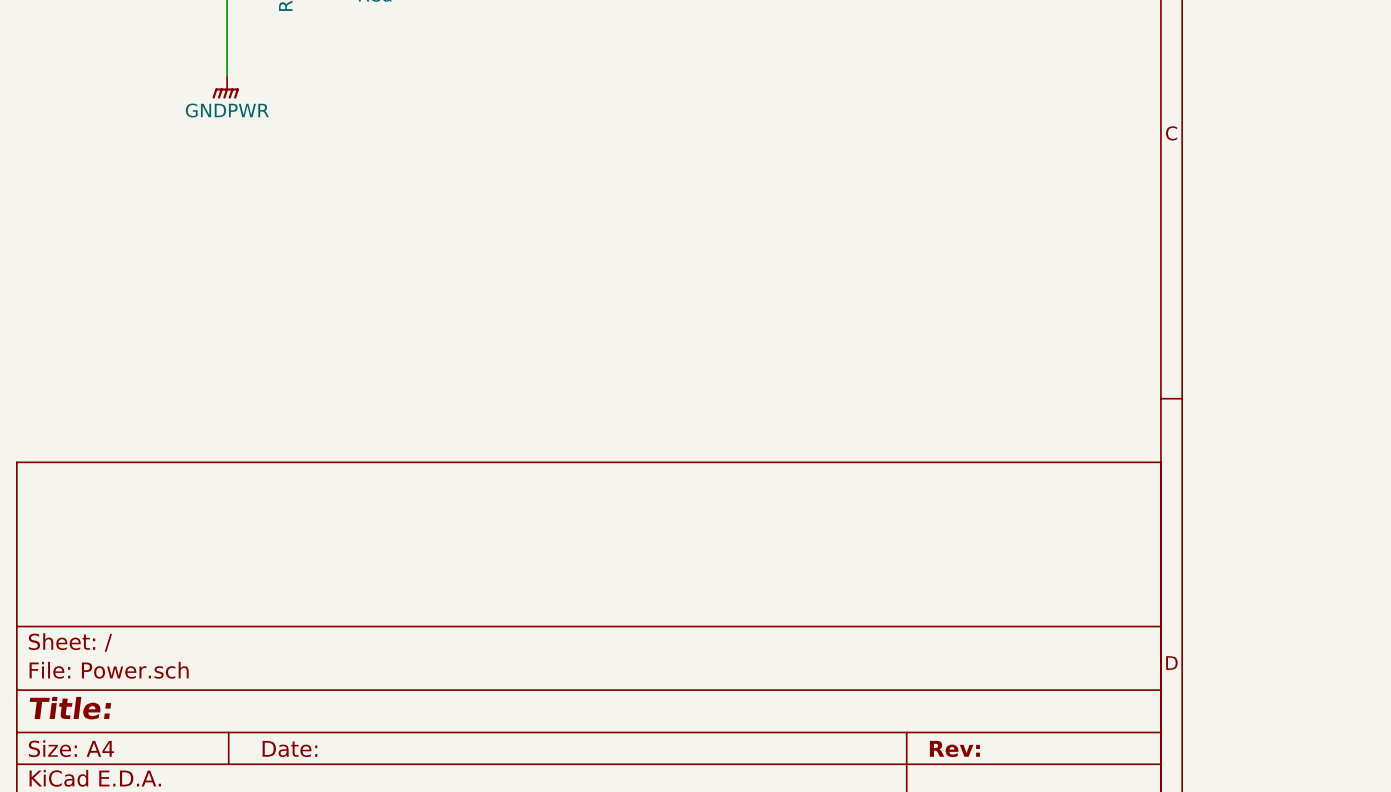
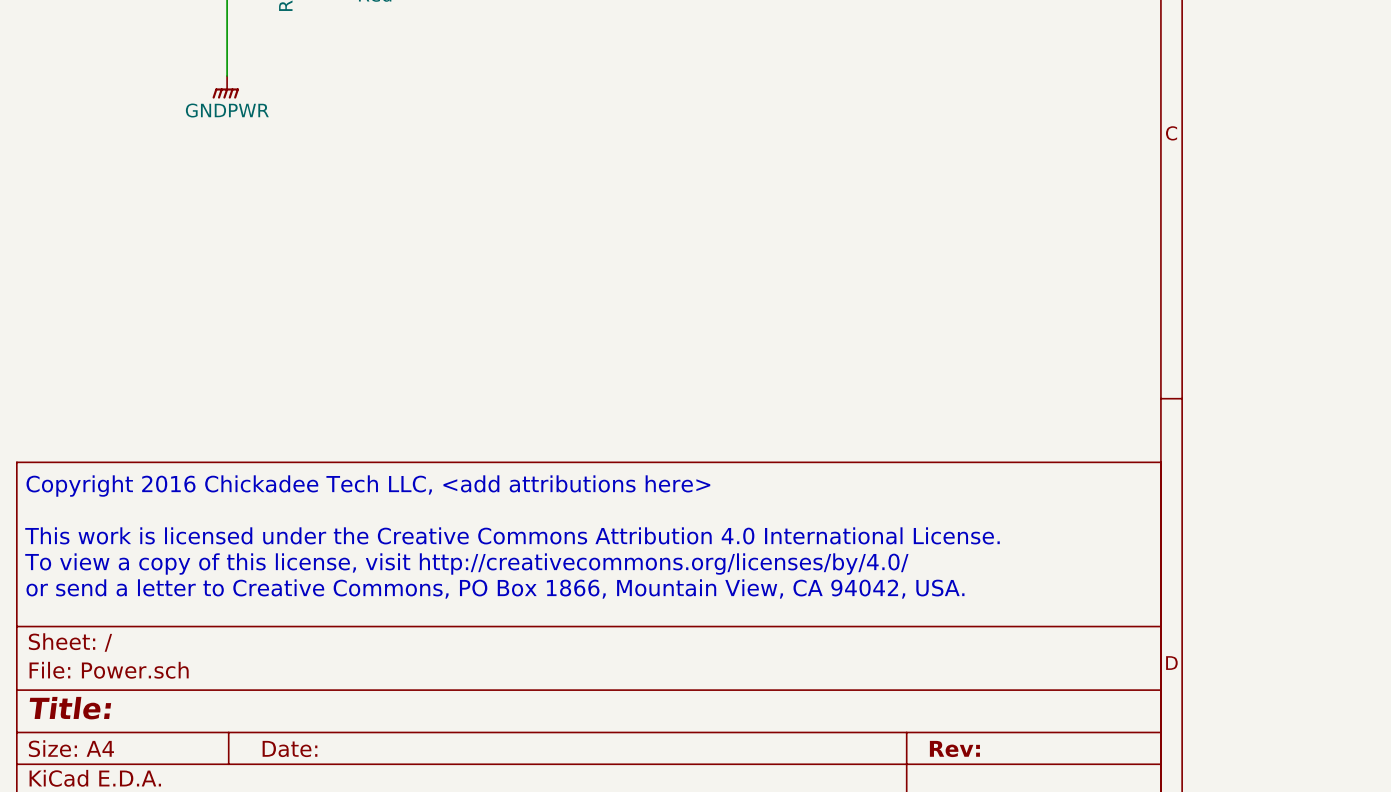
text: none -> Copyright 2016 Chickadee Tech LLC, <add attributions here> (368, 486)
text: none -> This work is licensed under the Creative Commons Attribution 4.0 International License. (512, 535)
text: none -> To view a copy of this license, visit http://creativecommons.org/licenses/by/4.0/ (466, 564)
text: none -> or send a letter to Creative Commons, PO Box 1866, Mountain View, CA 94042, USA. (495, 588)

